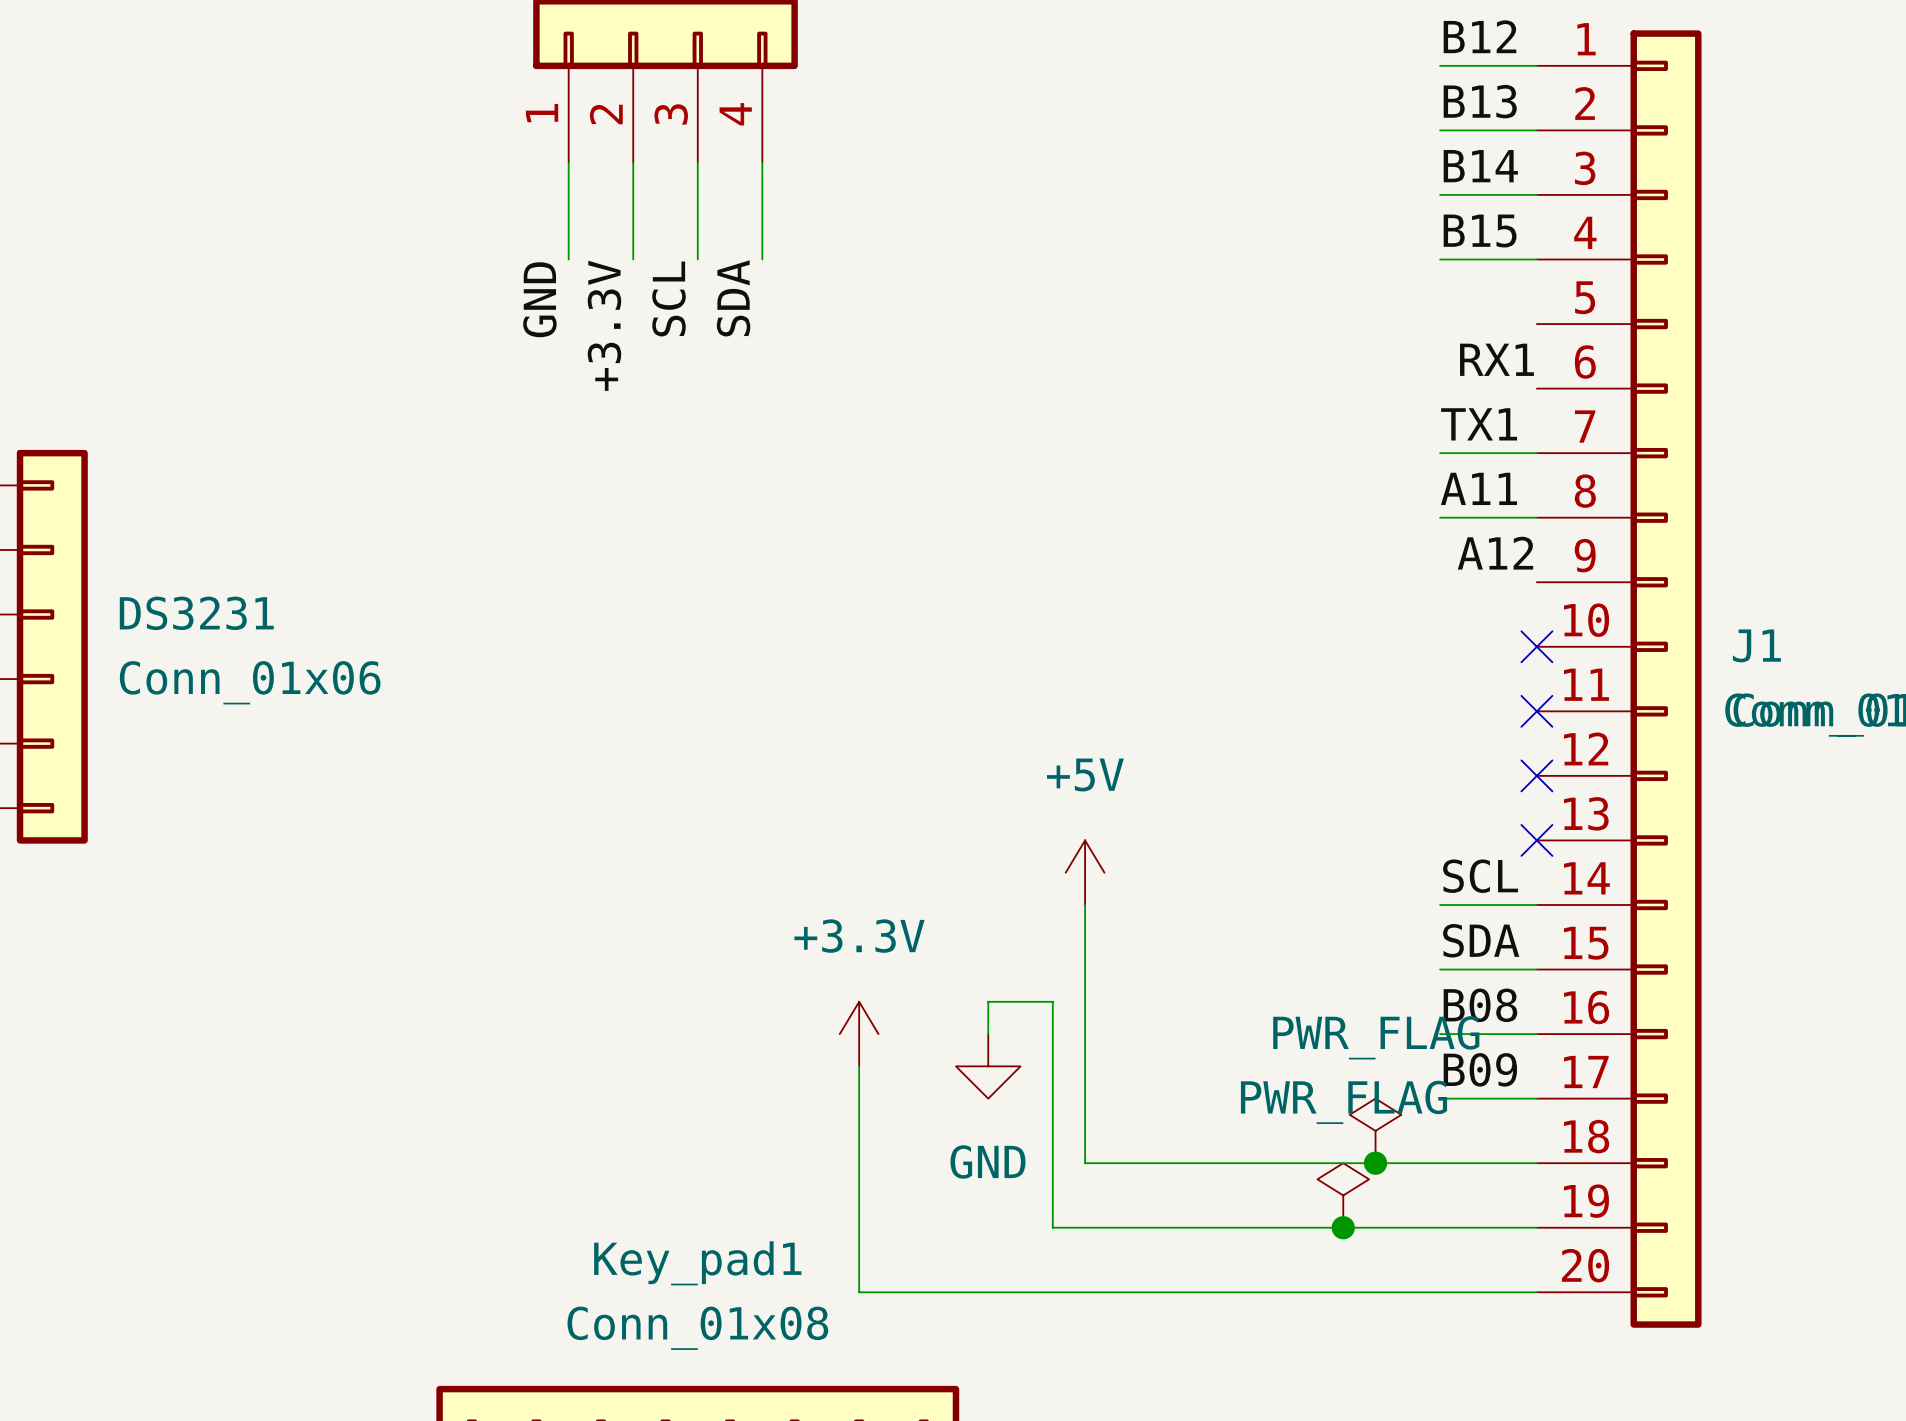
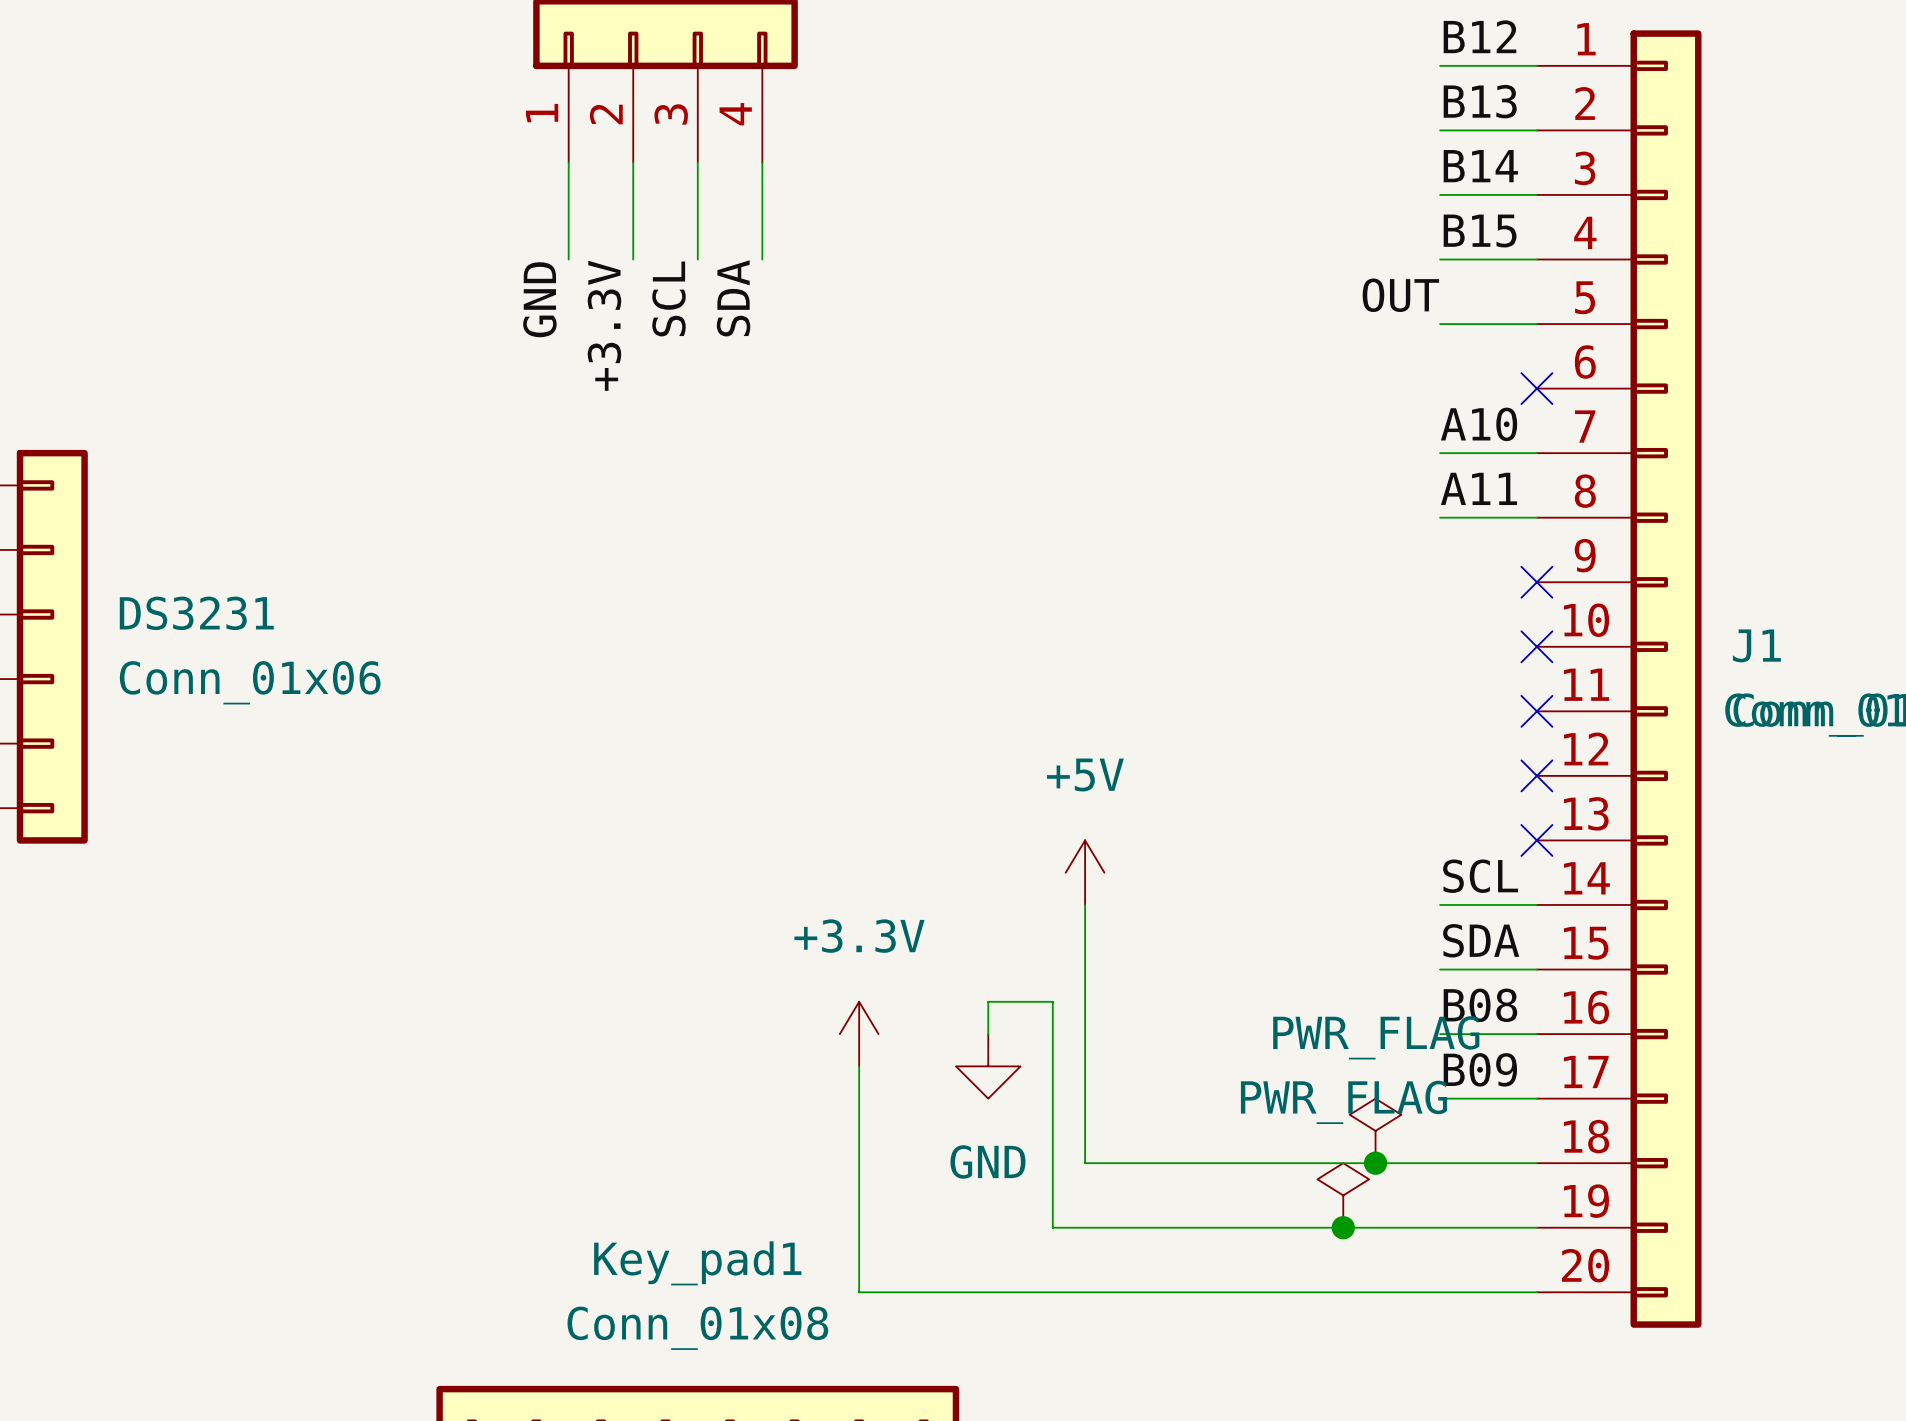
label: none -> OUT (1400, 295)
wire: none -> (1440, 324) (1536, 324)
label: RX1 (1496, 359) -> none
no-connect mark: none -> (1536, 388)
label: TX1 (1479, 424) -> A10 (1479, 424)
label: A12 (1495, 553) -> none
no-connect mark: none -> (1536, 582)

